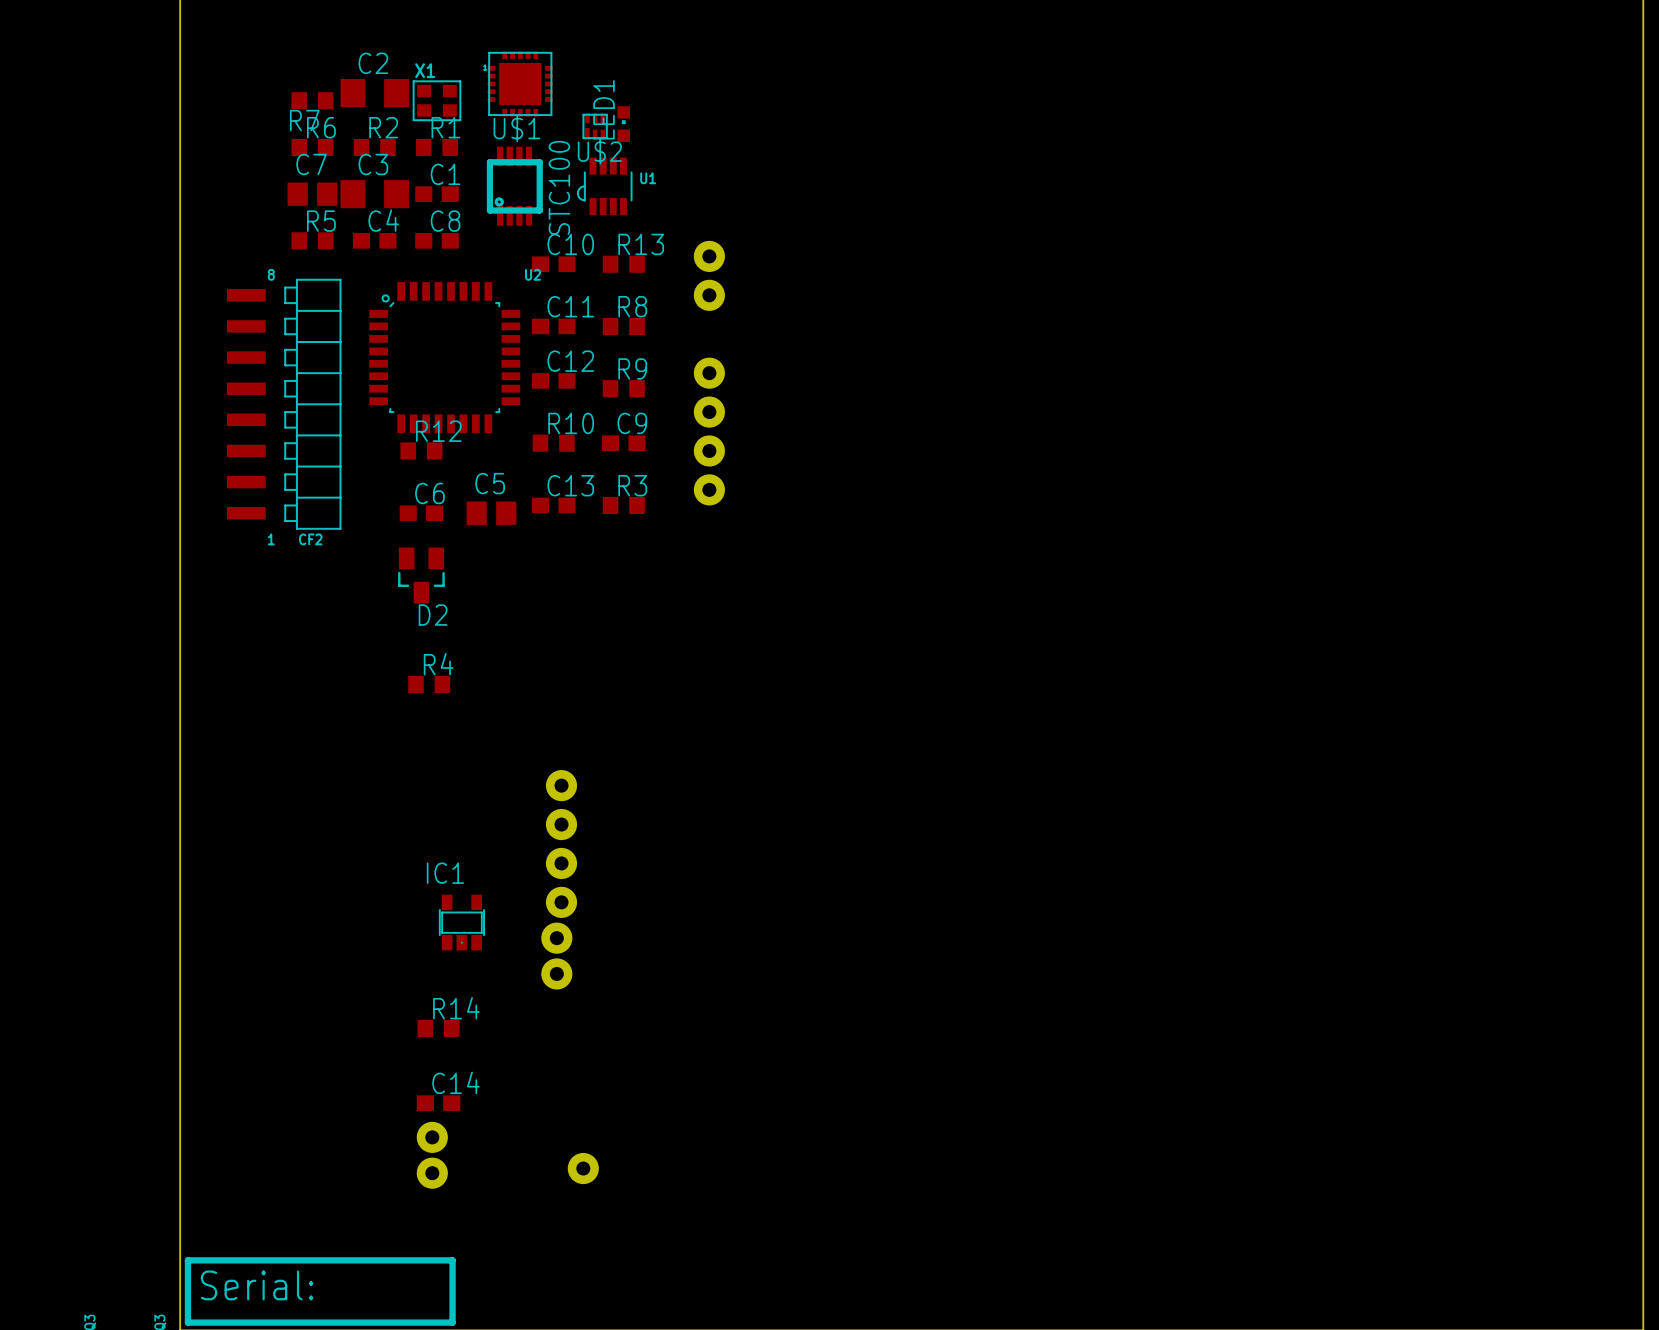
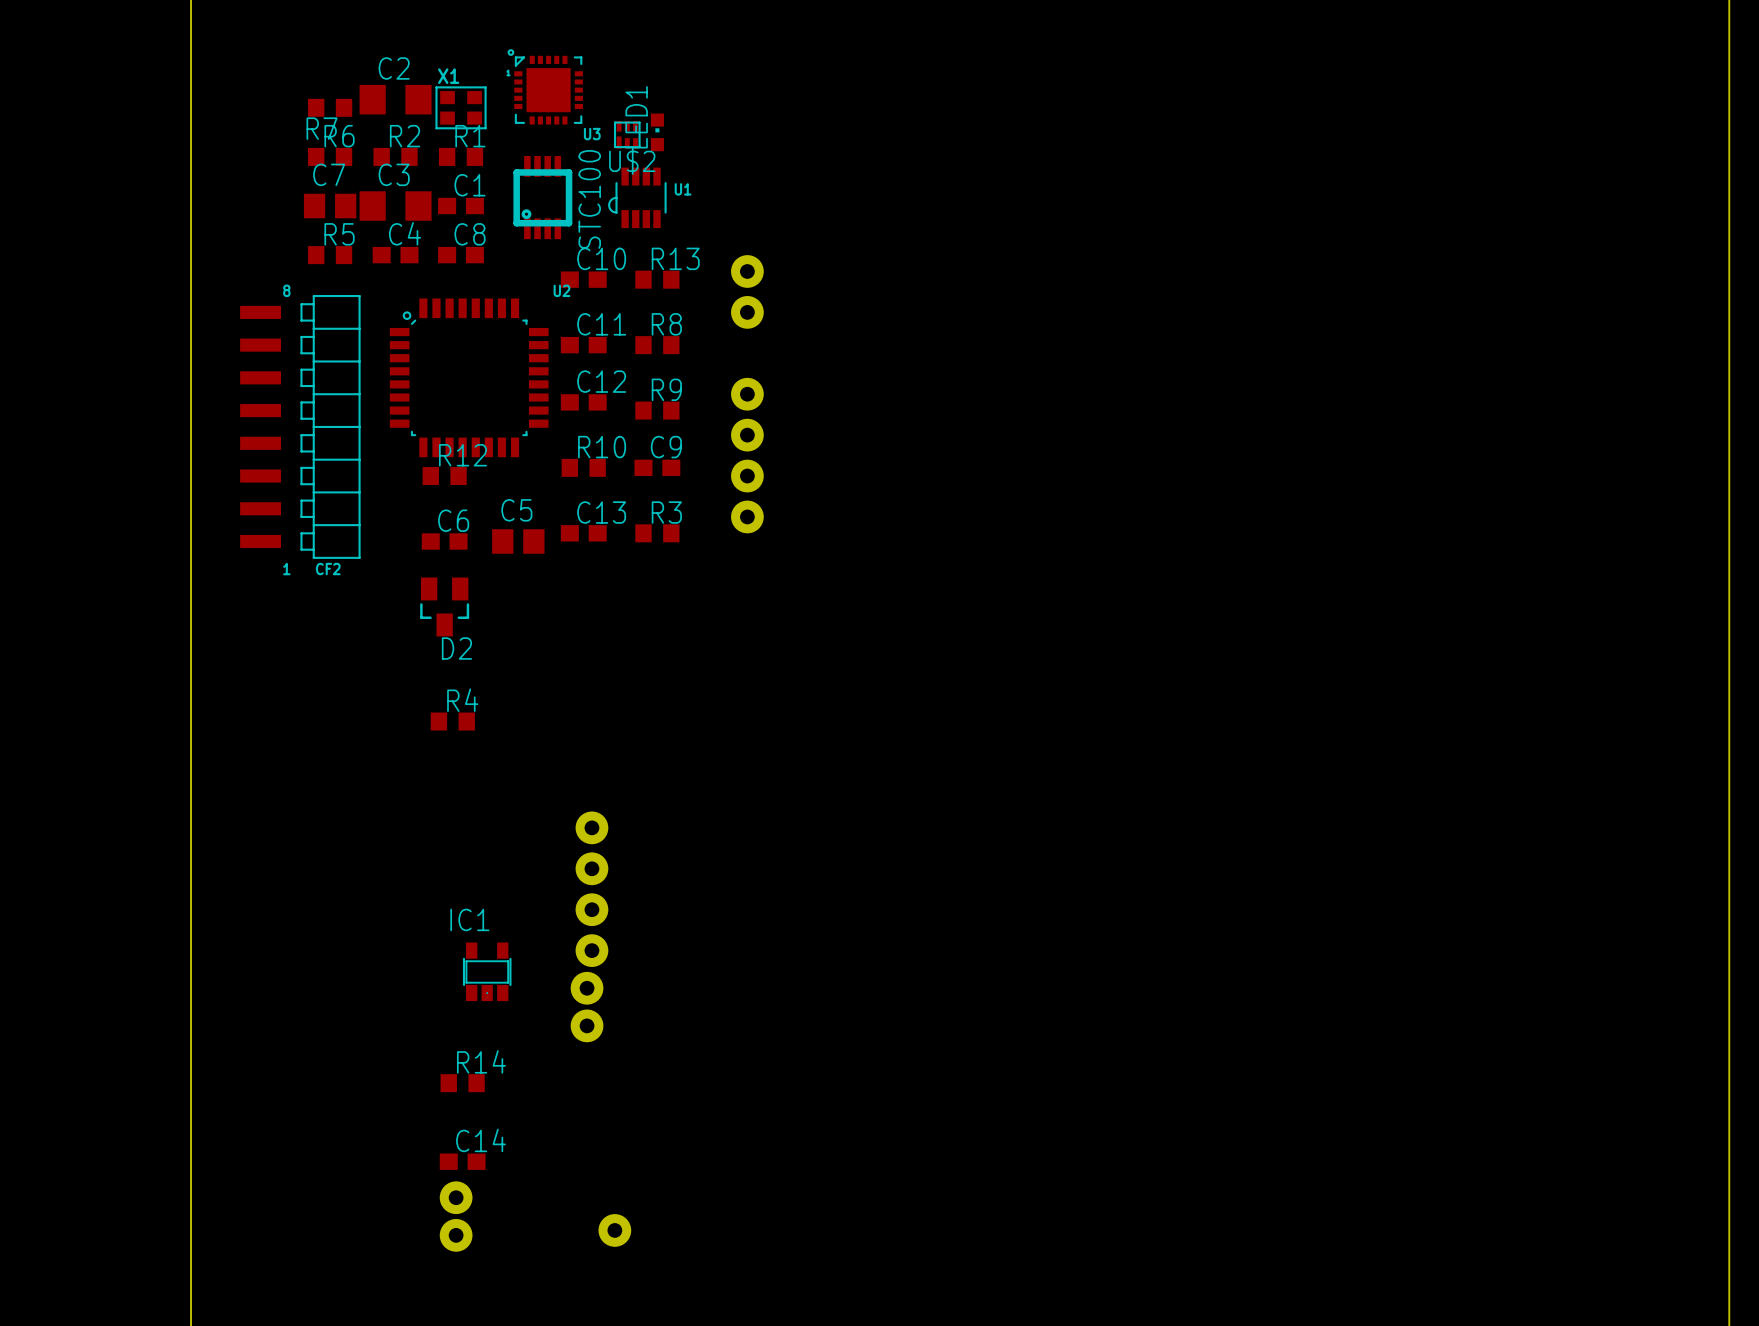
U3: none -> (545, 86)
U$1: (520, 83) -> none

